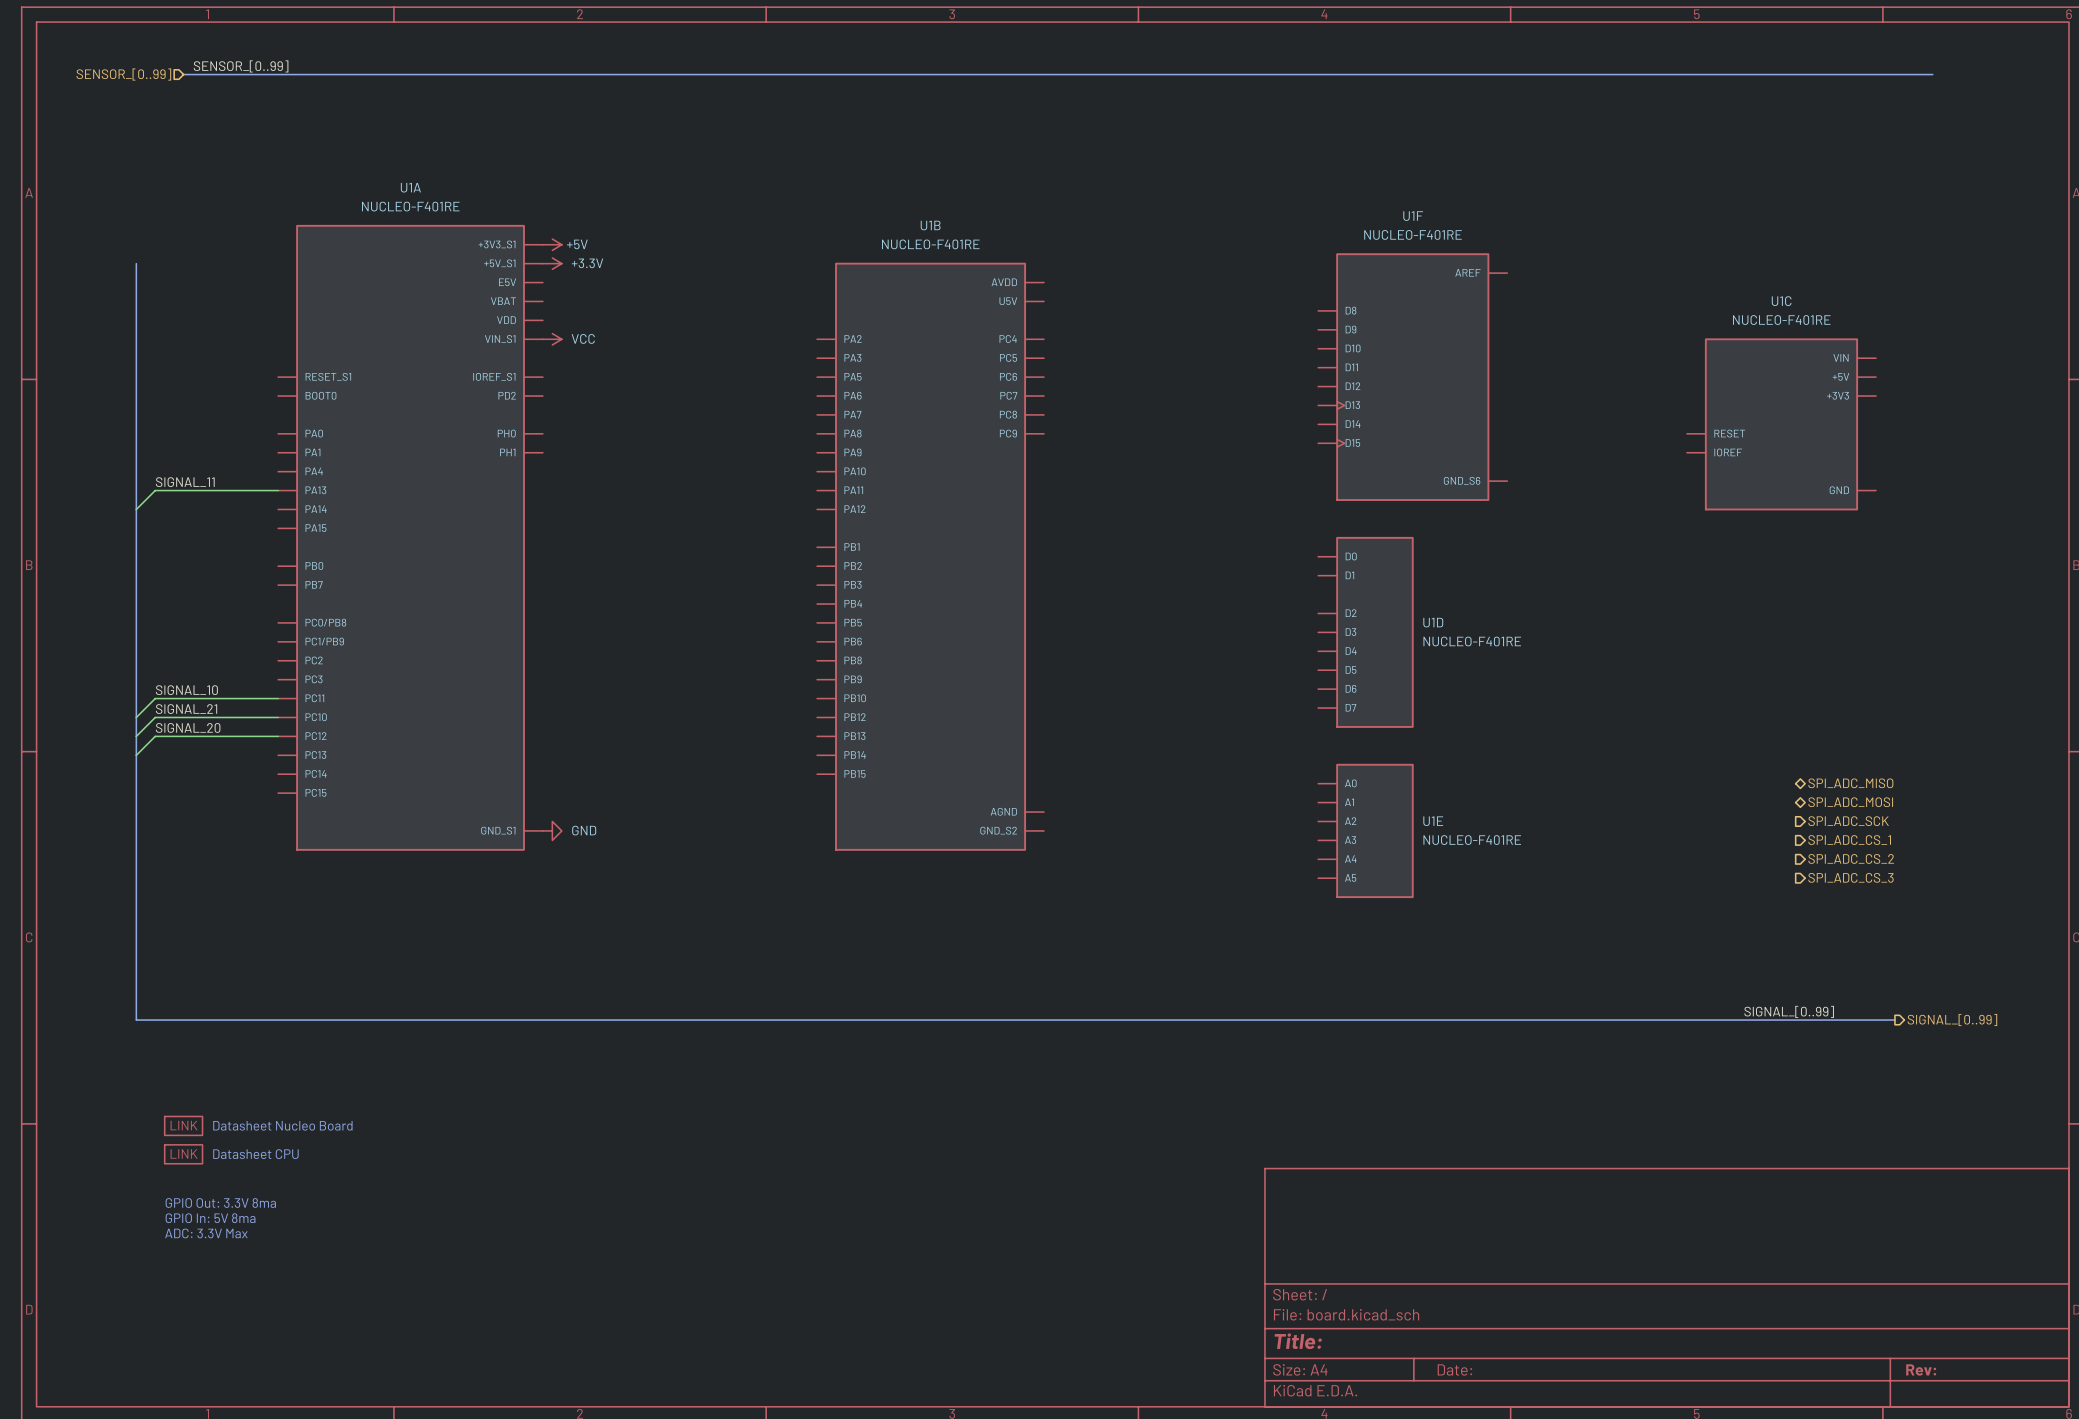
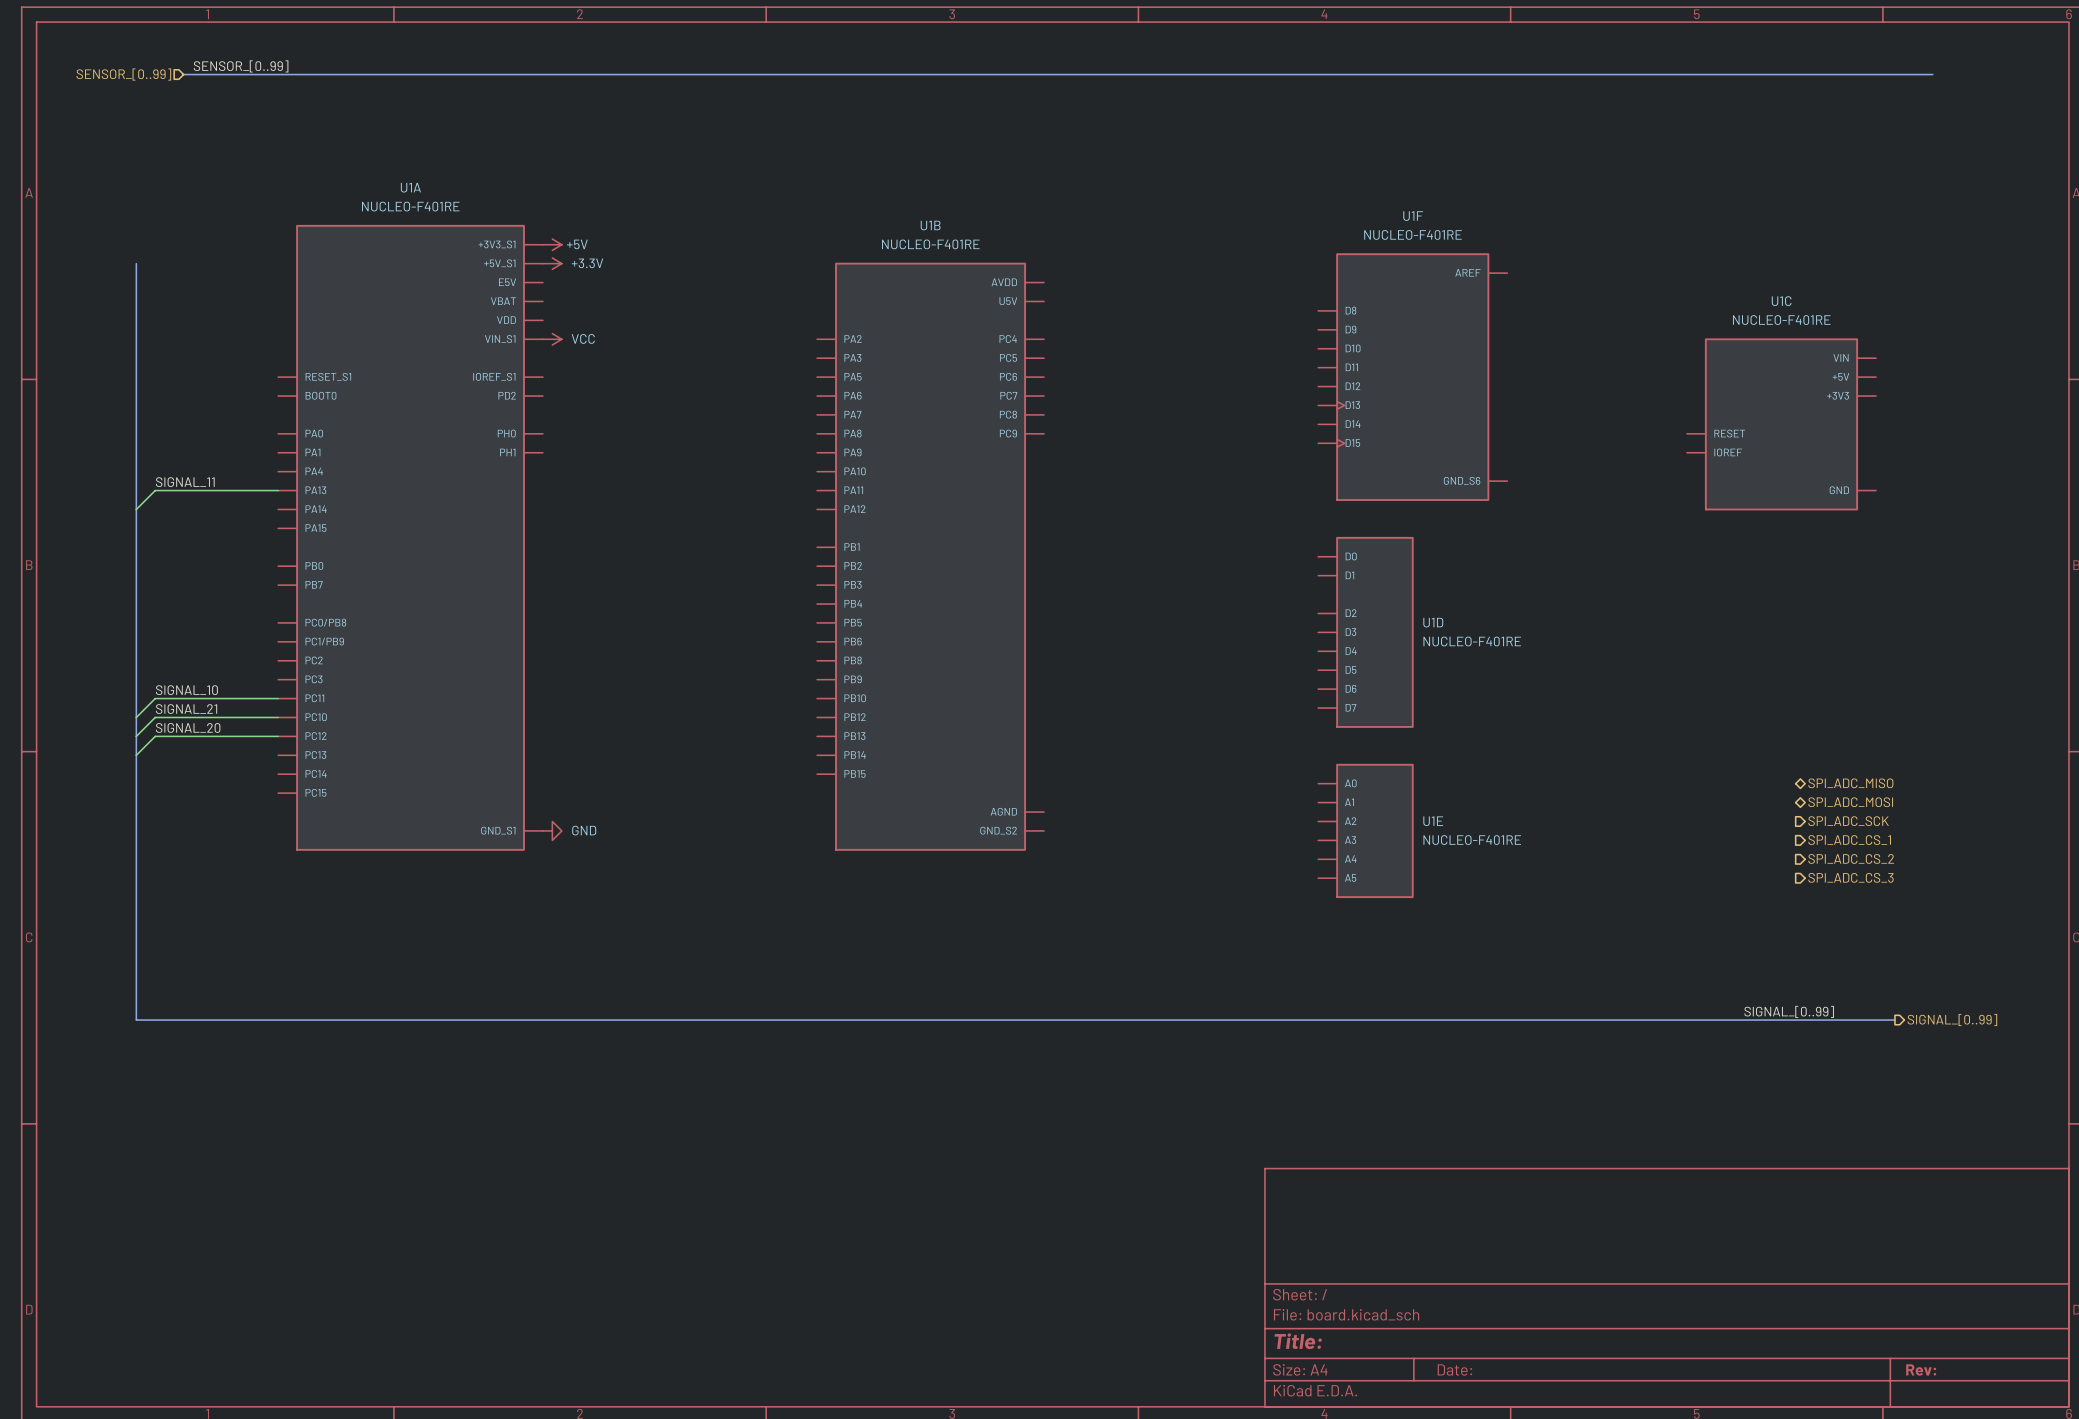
power symbol: (183, 1125) -> none
text: Datasheet Nucleo Board (282, 1125) -> none
power symbol: (183, 1154) -> none
text: Datasheet CPU (255, 1154) -> none
text: GPIO Out: 3.3V 8ma (220, 1202) -> none
text: GPIO In: 5V 8ma (210, 1218) -> none
text: ADC: 3.3V Max (206, 1233) -> none

